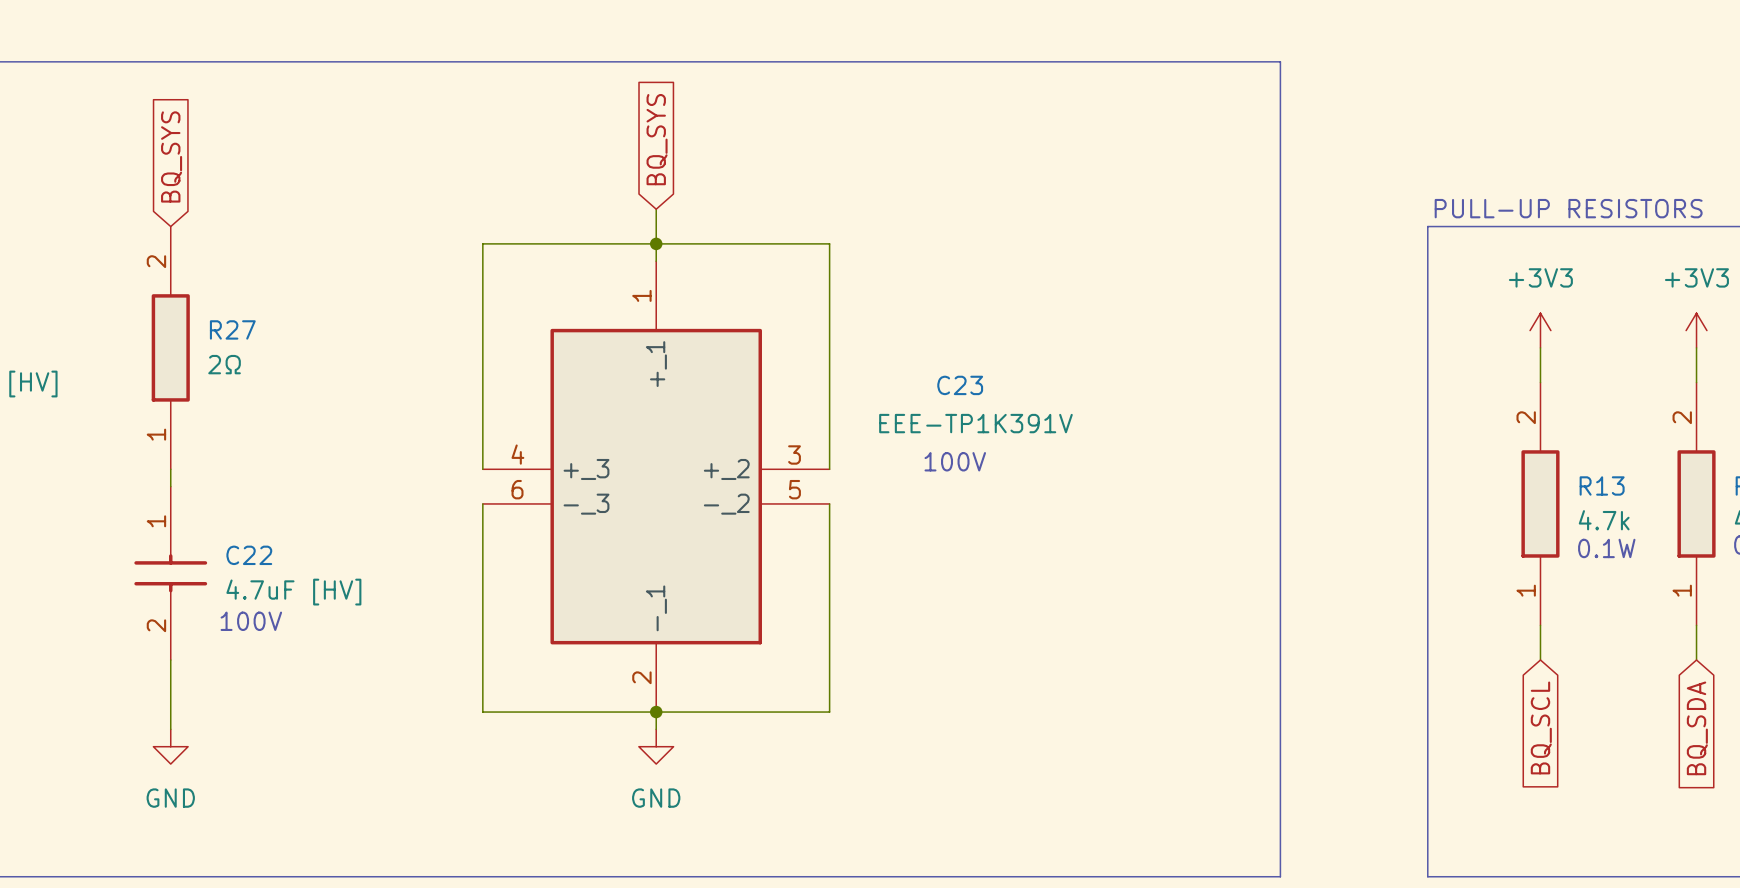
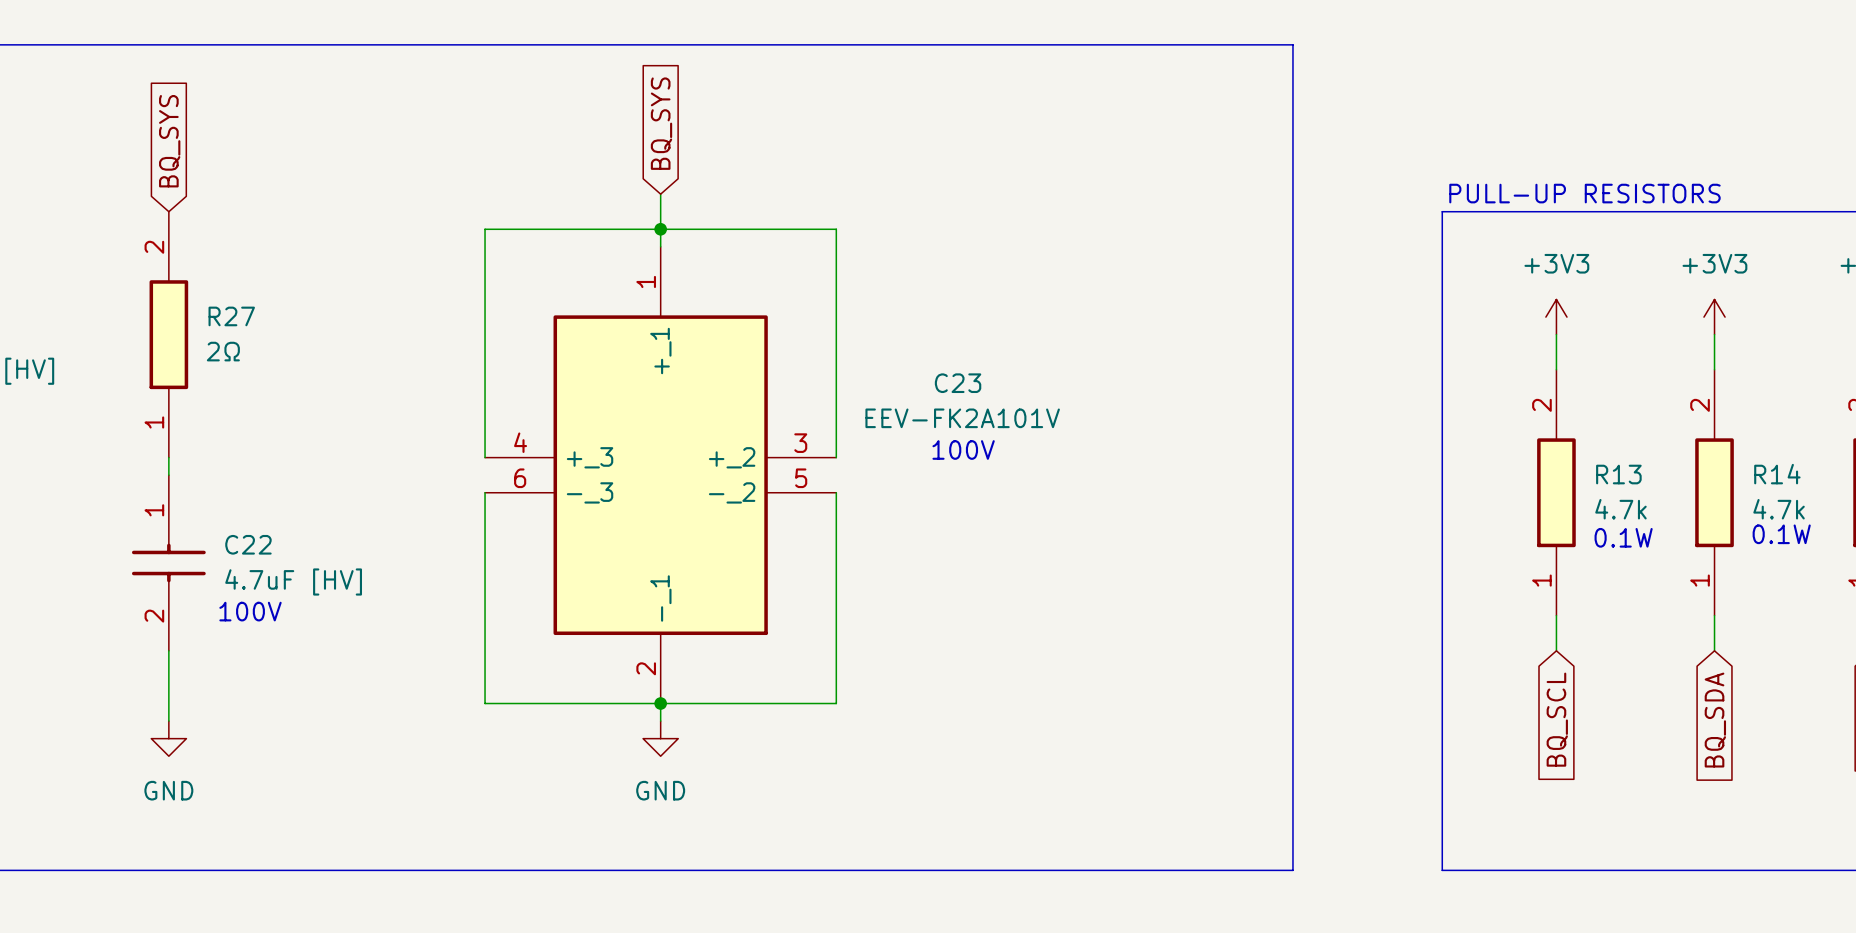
C23 name position: C23 (960, 385) -> C23 (958, 383)
C23 value: EEE-TP1K391V (975, 423) -> EEV-FK2A101V (962, 418)

